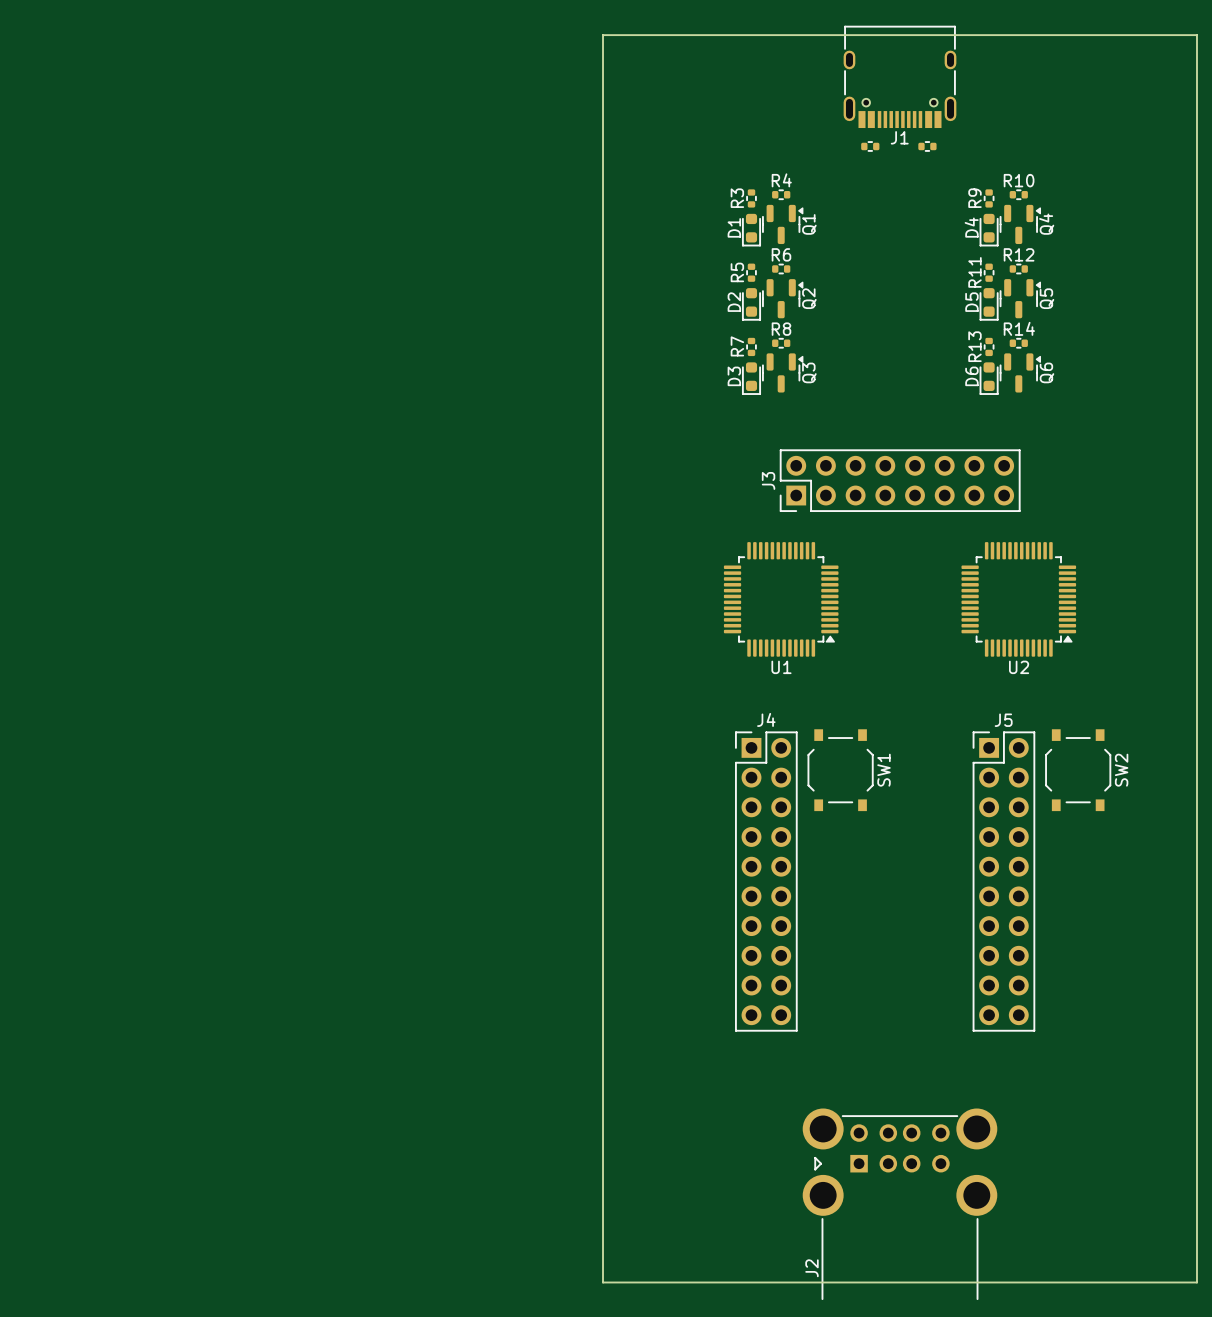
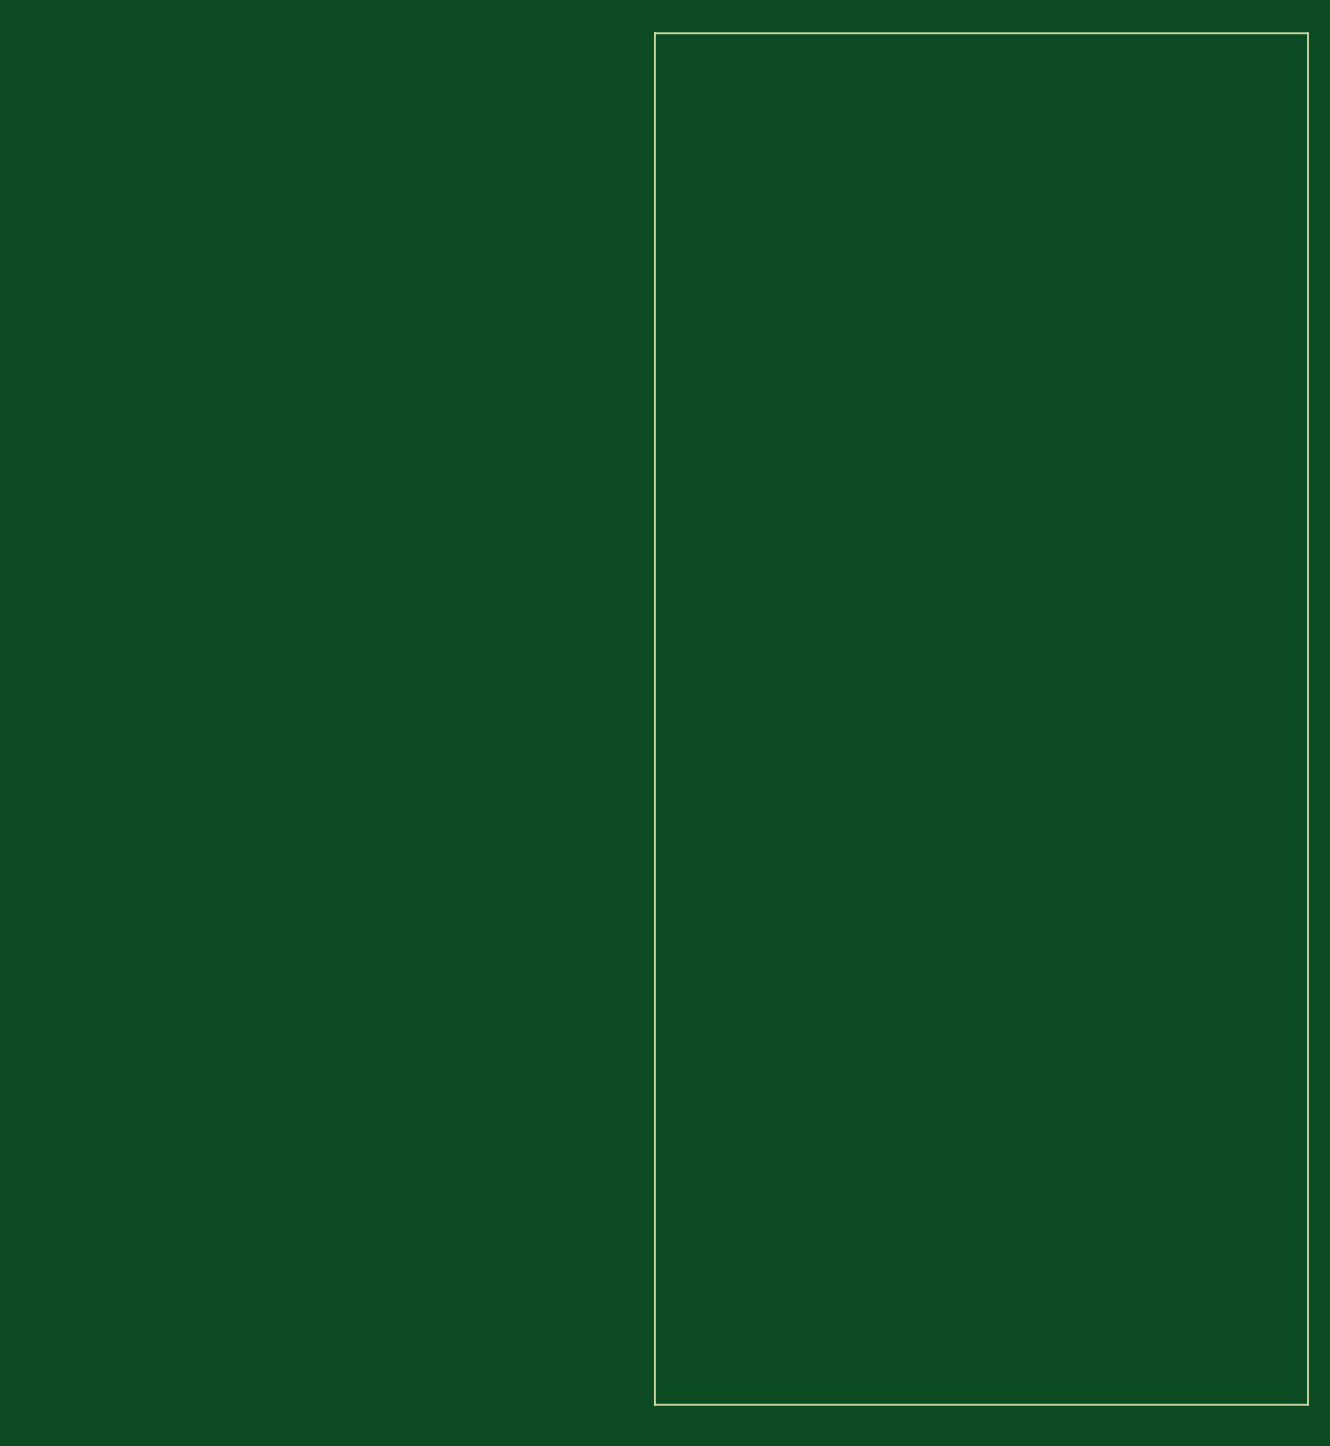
J1: (899, 76) -> none
part: (870, 146) -> none
part: (927, 146) -> none
R4: (781, 194) -> none
R10: (1018, 194) -> none
R3: (751, 198) -> none
R9: (989, 198) -> none
Q1: (782, 224) -> none
Q4: (1020, 224) -> none
D1: (751, 230) -> none
D4: (989, 230) -> none
R6: (781, 268) -> none
R12: (1018, 268) -> none
R5: (751, 272) -> none
R11: (989, 272) -> none
Q2: (782, 298) -> none
Q5: (1020, 298) -> none
D2: (751, 304) -> none
D5: (989, 304) -> none
R8: (781, 343) -> none
R14: (1018, 343) -> none
R7: (751, 346) -> none
R13: (989, 346) -> none
Q3: (782, 372) -> none
Q6: (1020, 372) -> none
D3: (751, 378) -> none
D6: (989, 378) -> none
J3: (900, 480) -> none
U1: (781, 599) -> none
U2: (1018, 599) -> none
SW1: (840, 770) -> none
SW2: (1078, 770) -> none
J4: (766, 881) -> none
J5: (1003, 881) -> none
J2: (899, 1204) -> none

